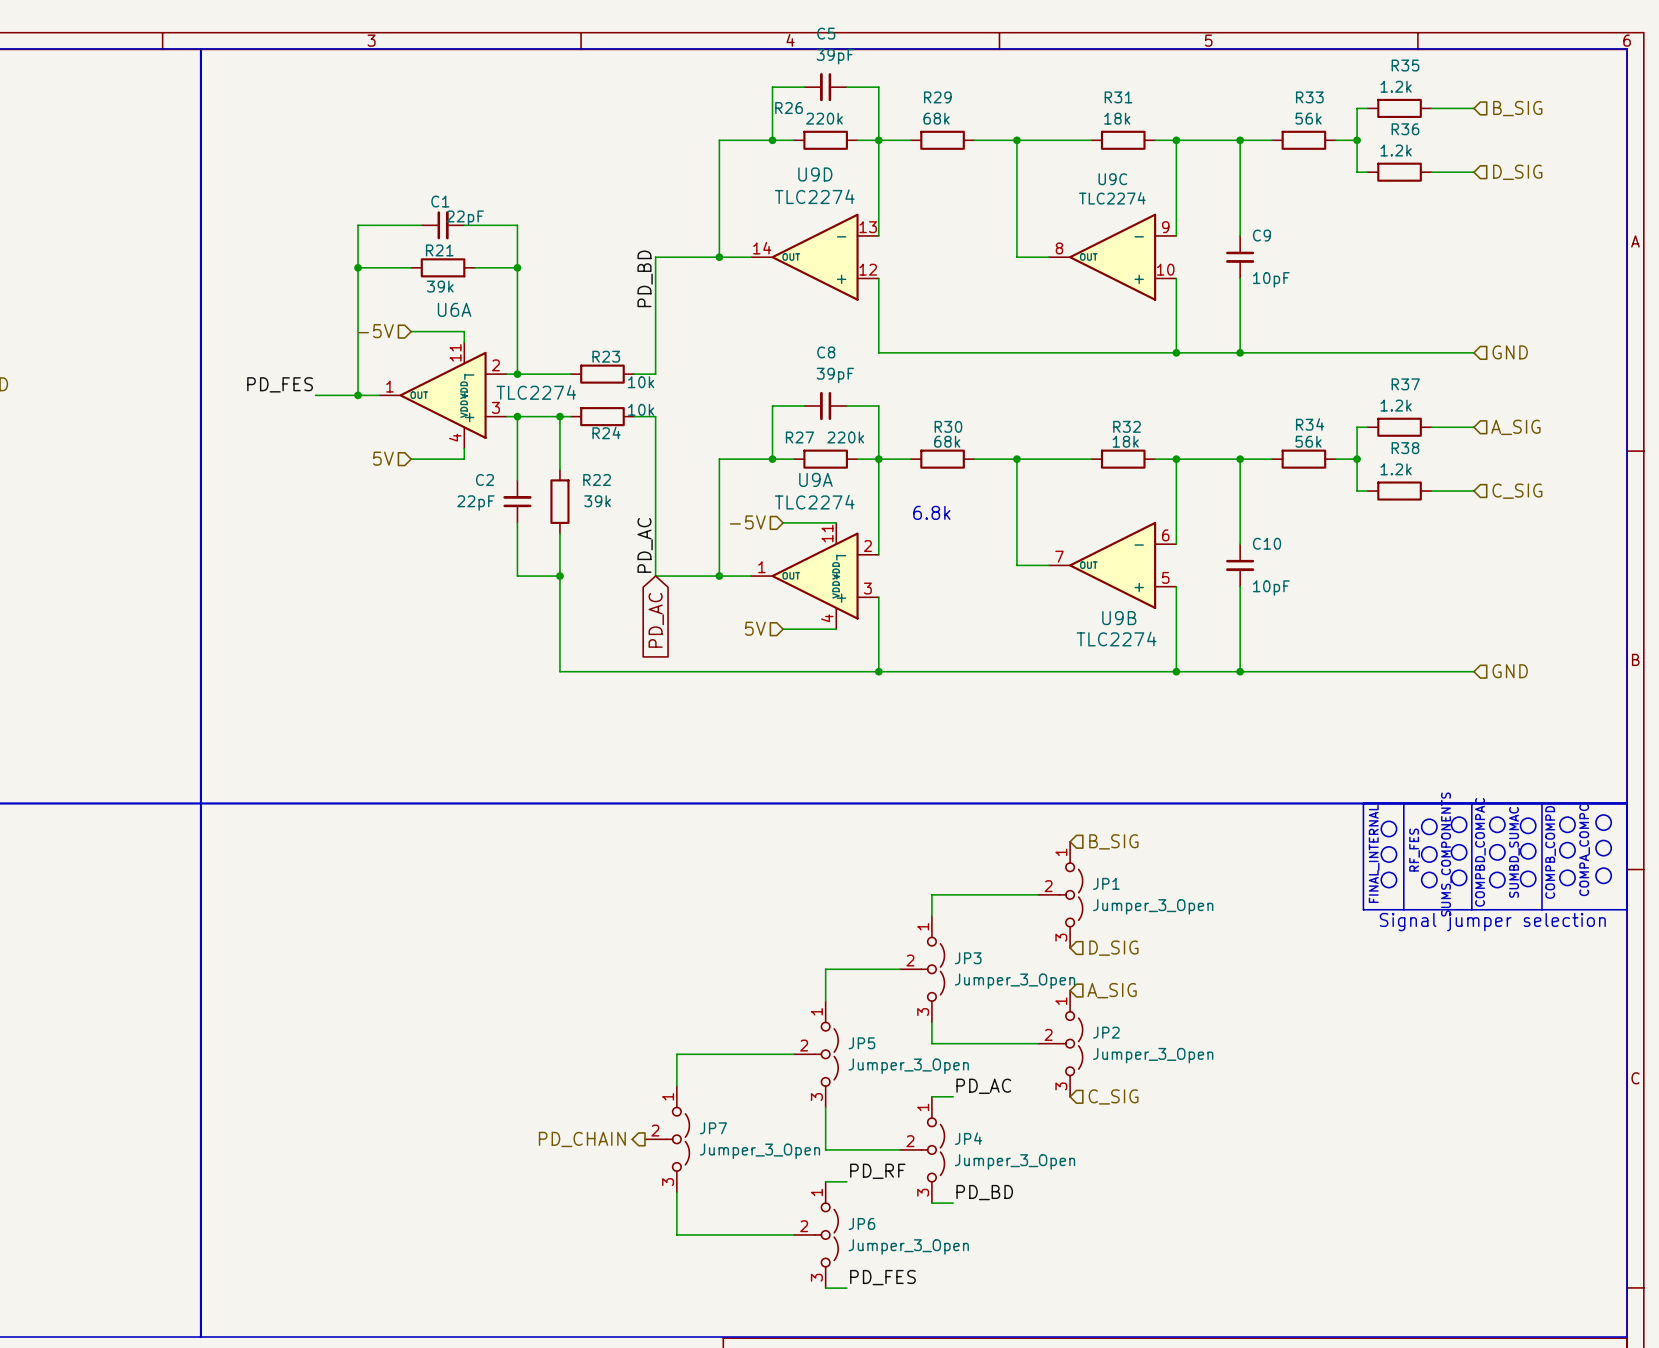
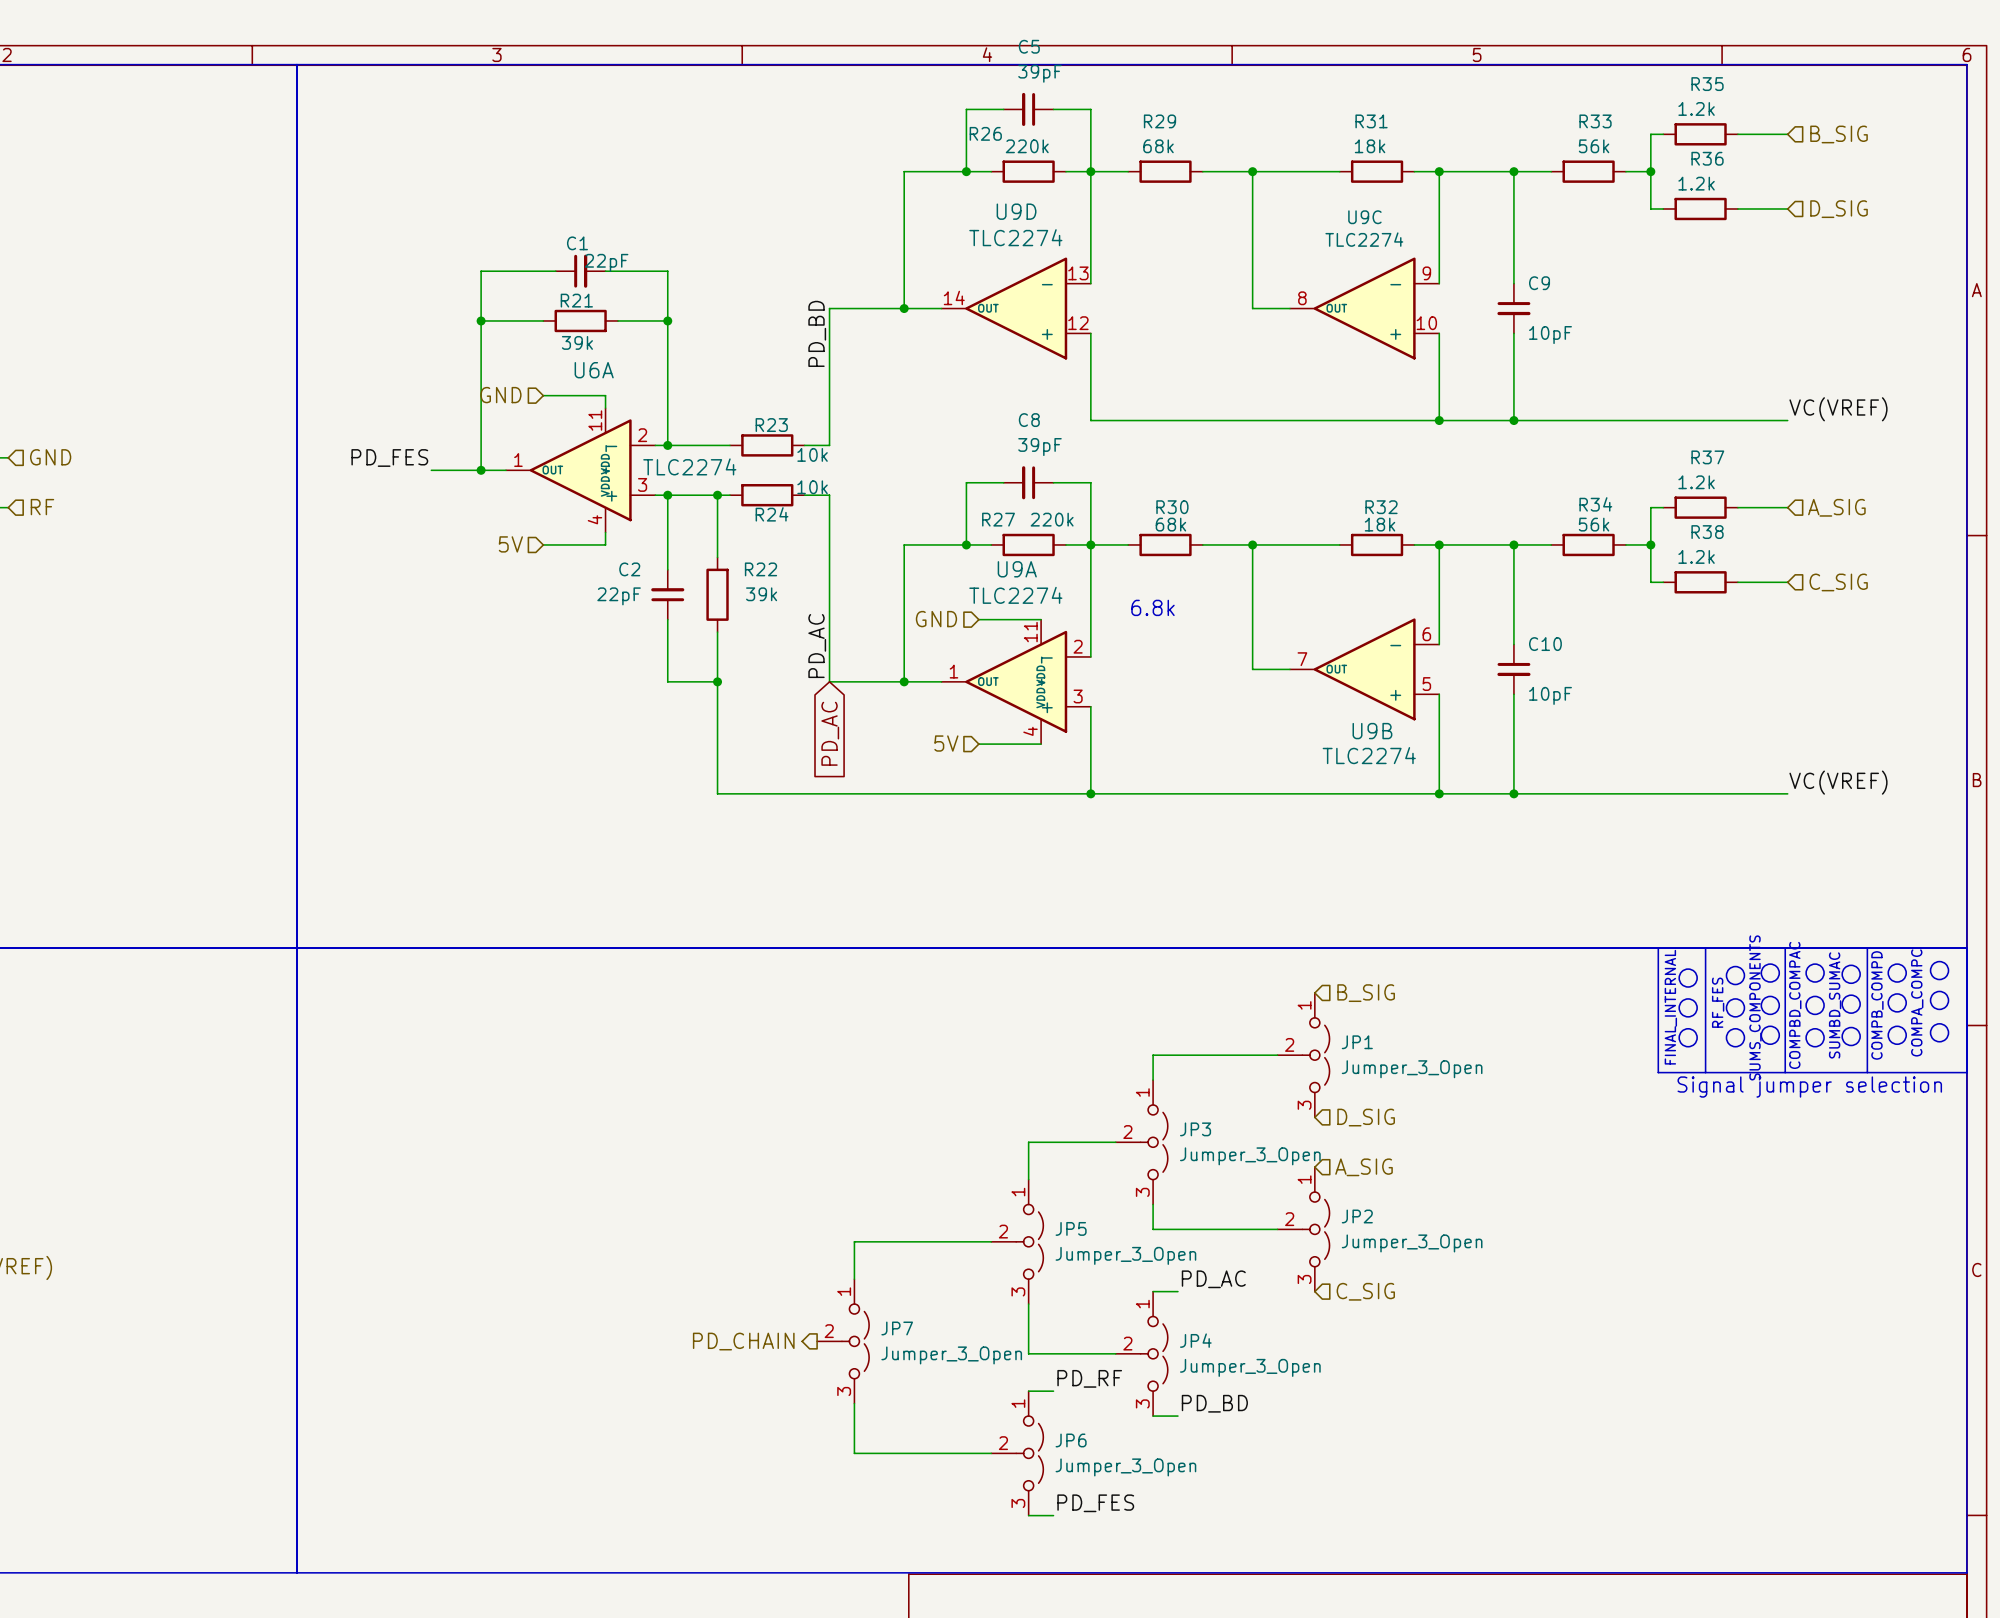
hierarchical label: -5V (375, 331) -> GND (500, 395)
label: none -> VC(VREF) (1838, 409)
hierarchical label: GND (1510, 352) -> none
hierarchical label: -5V (747, 522) -> GND (936, 619)
label: none -> VC(VREF) (1838, 782)
hierarchical label: GND (1510, 671) -> none

